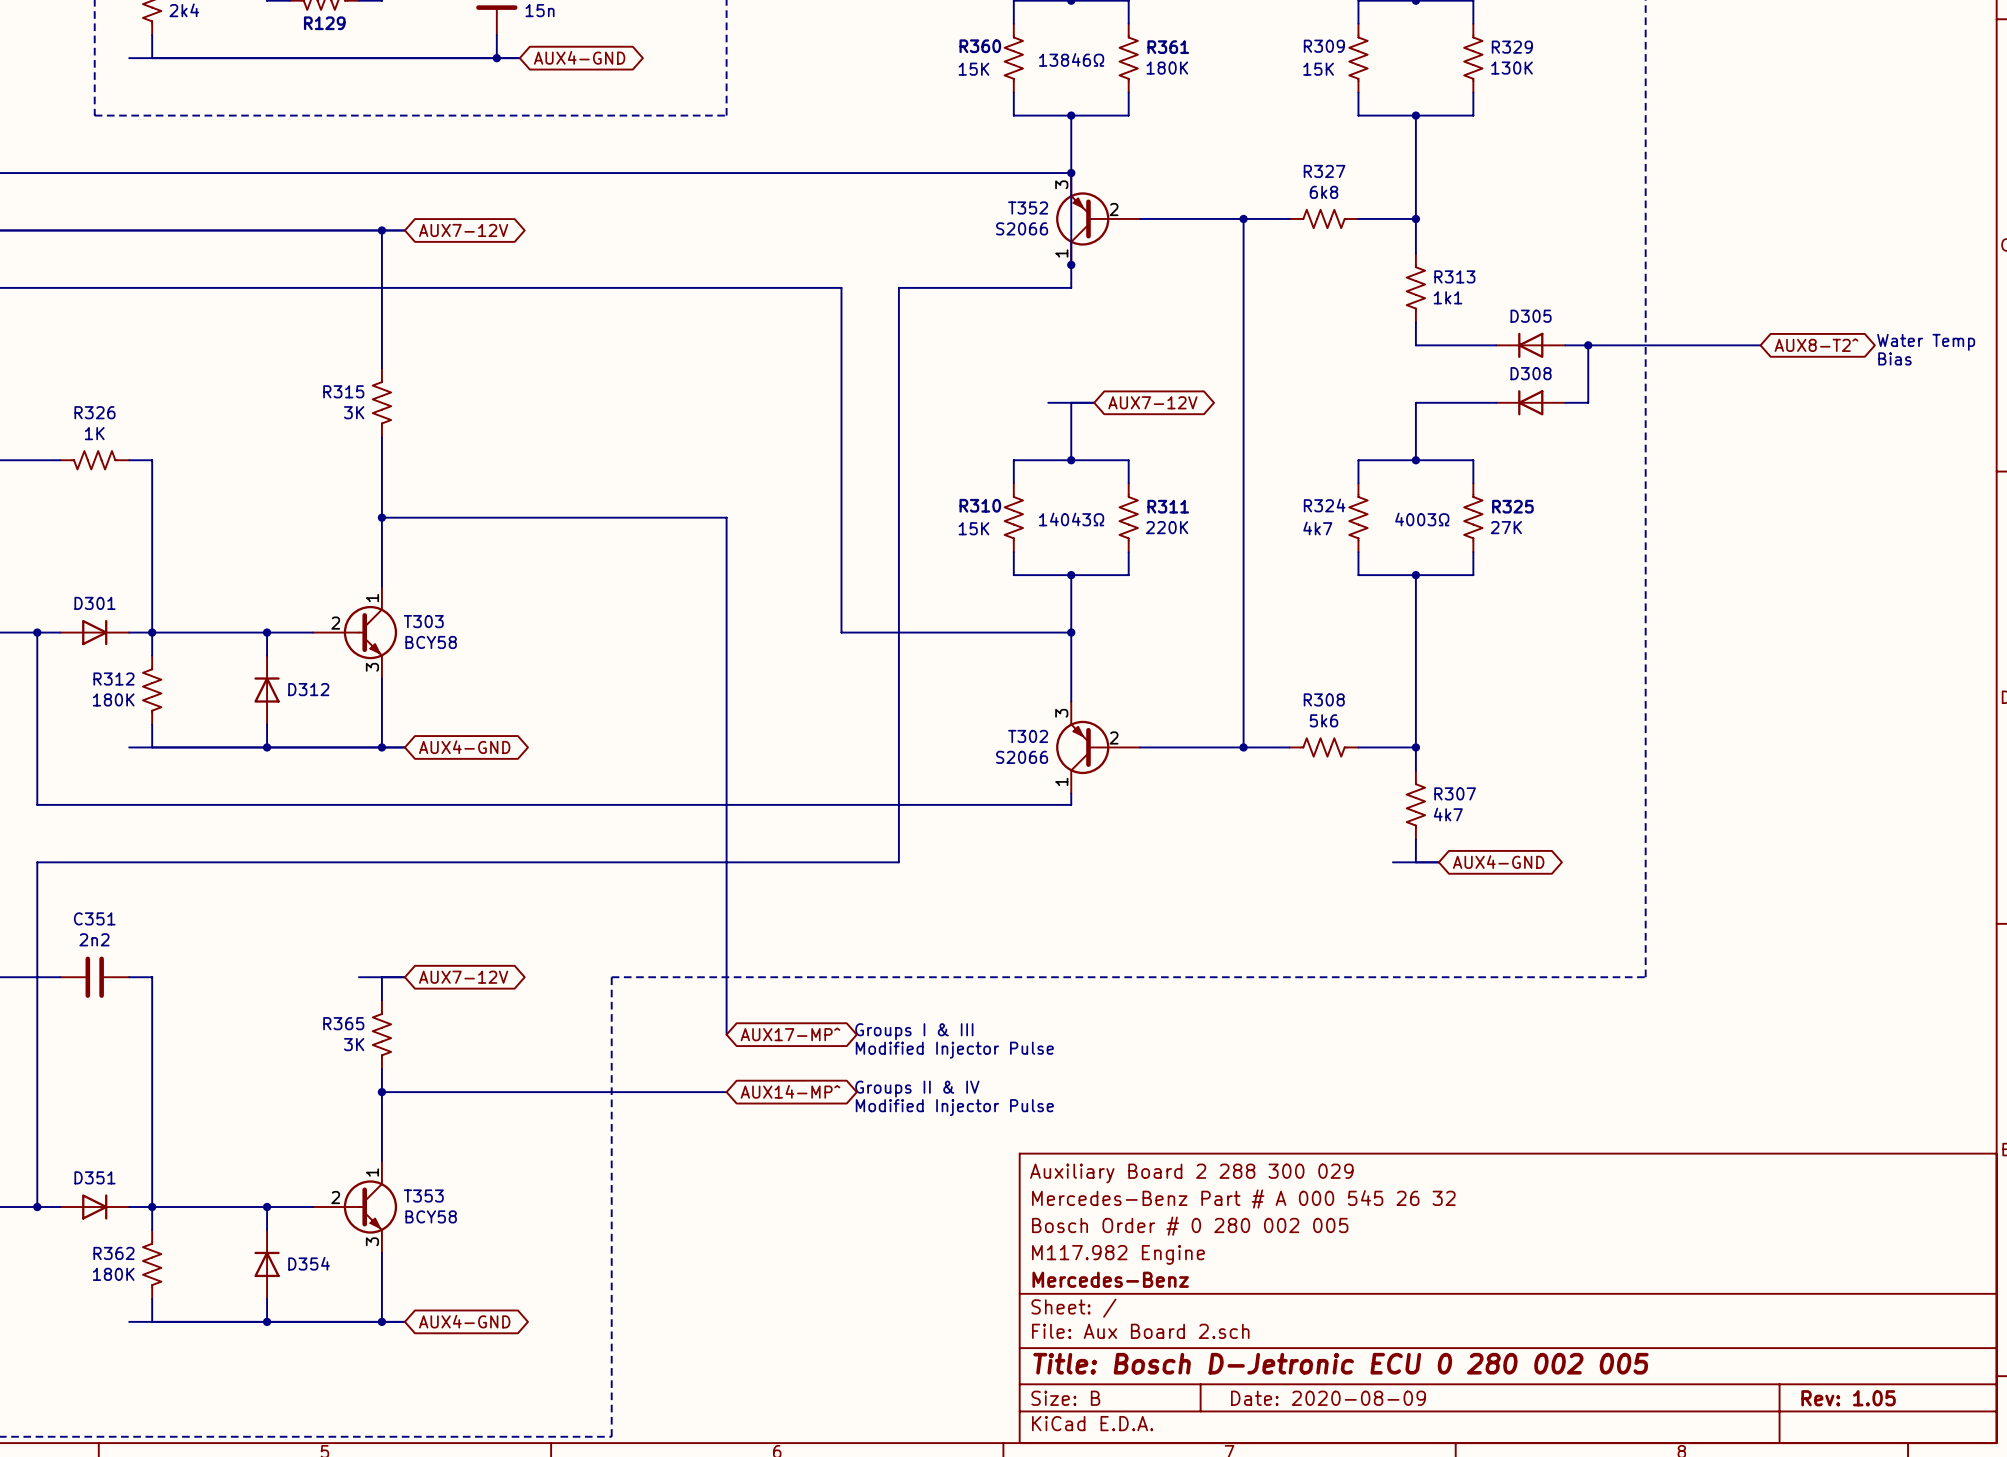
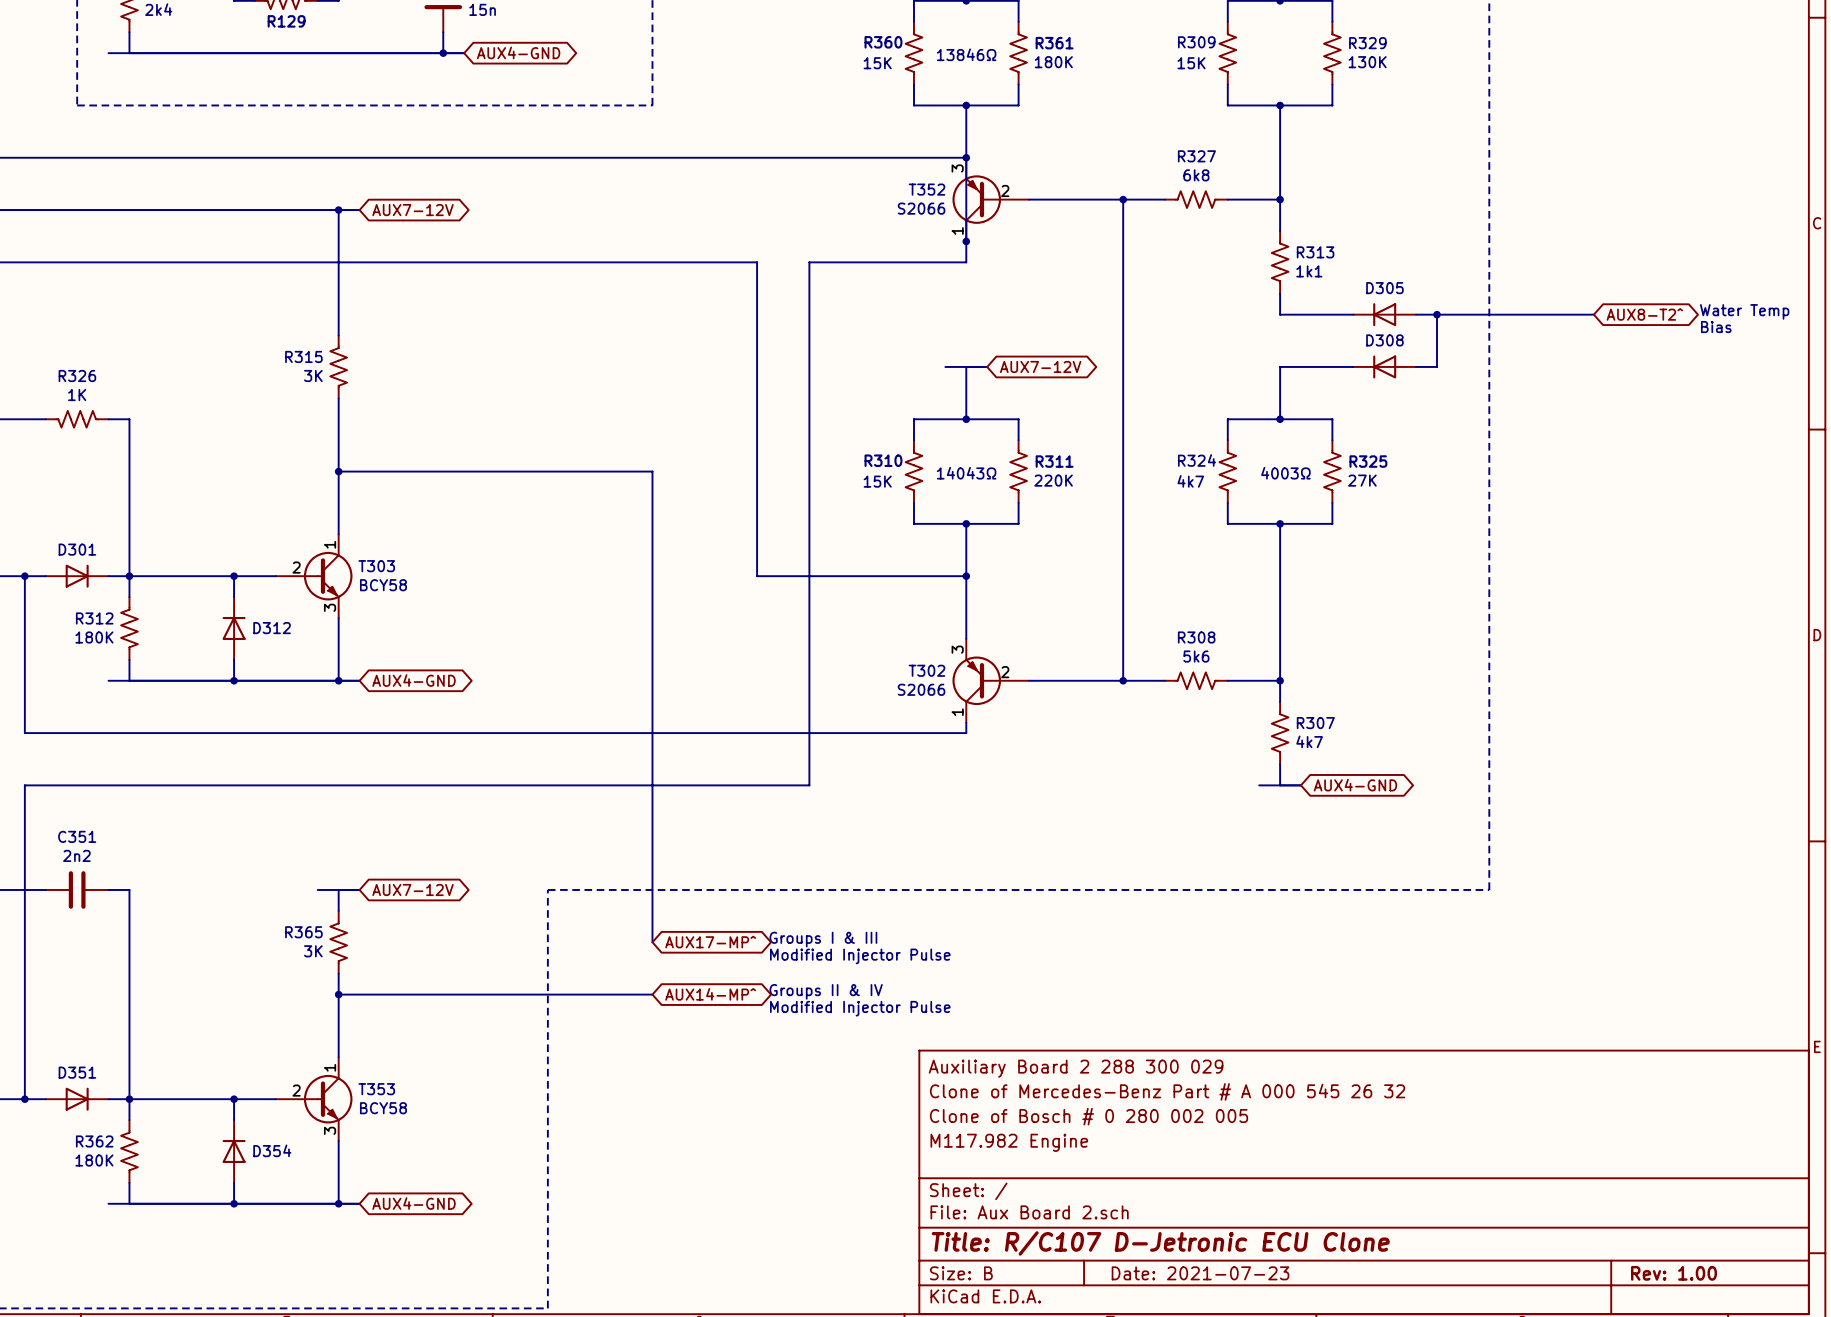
title block: Mercedes-Benz Part # A 000 545 26 32 (1243, 1198) -> Clone of Mercedes-Benz Part # A 000 545 26 32 (1167, 1091)
title block: Bosch Order # 0 280 002 005 (1190, 1226) -> Clone of Bosch # 0 280 002 005 (1089, 1116)
title block: Mercedes-Benz (1110, 1279) -> none
title block: Title: Bosch D-Jetronic ECU 0 280 002 005 (1340, 1363) -> Title: R/C107 D-Jetronic ECU Clone (1160, 1243)
title block: Date: 2020-08-09 (1328, 1398) -> Date: 2021-07-23 (1200, 1273)
title block: Rev: 1.05 (1848, 1398) -> Rev: 1.00 (1674, 1273)

